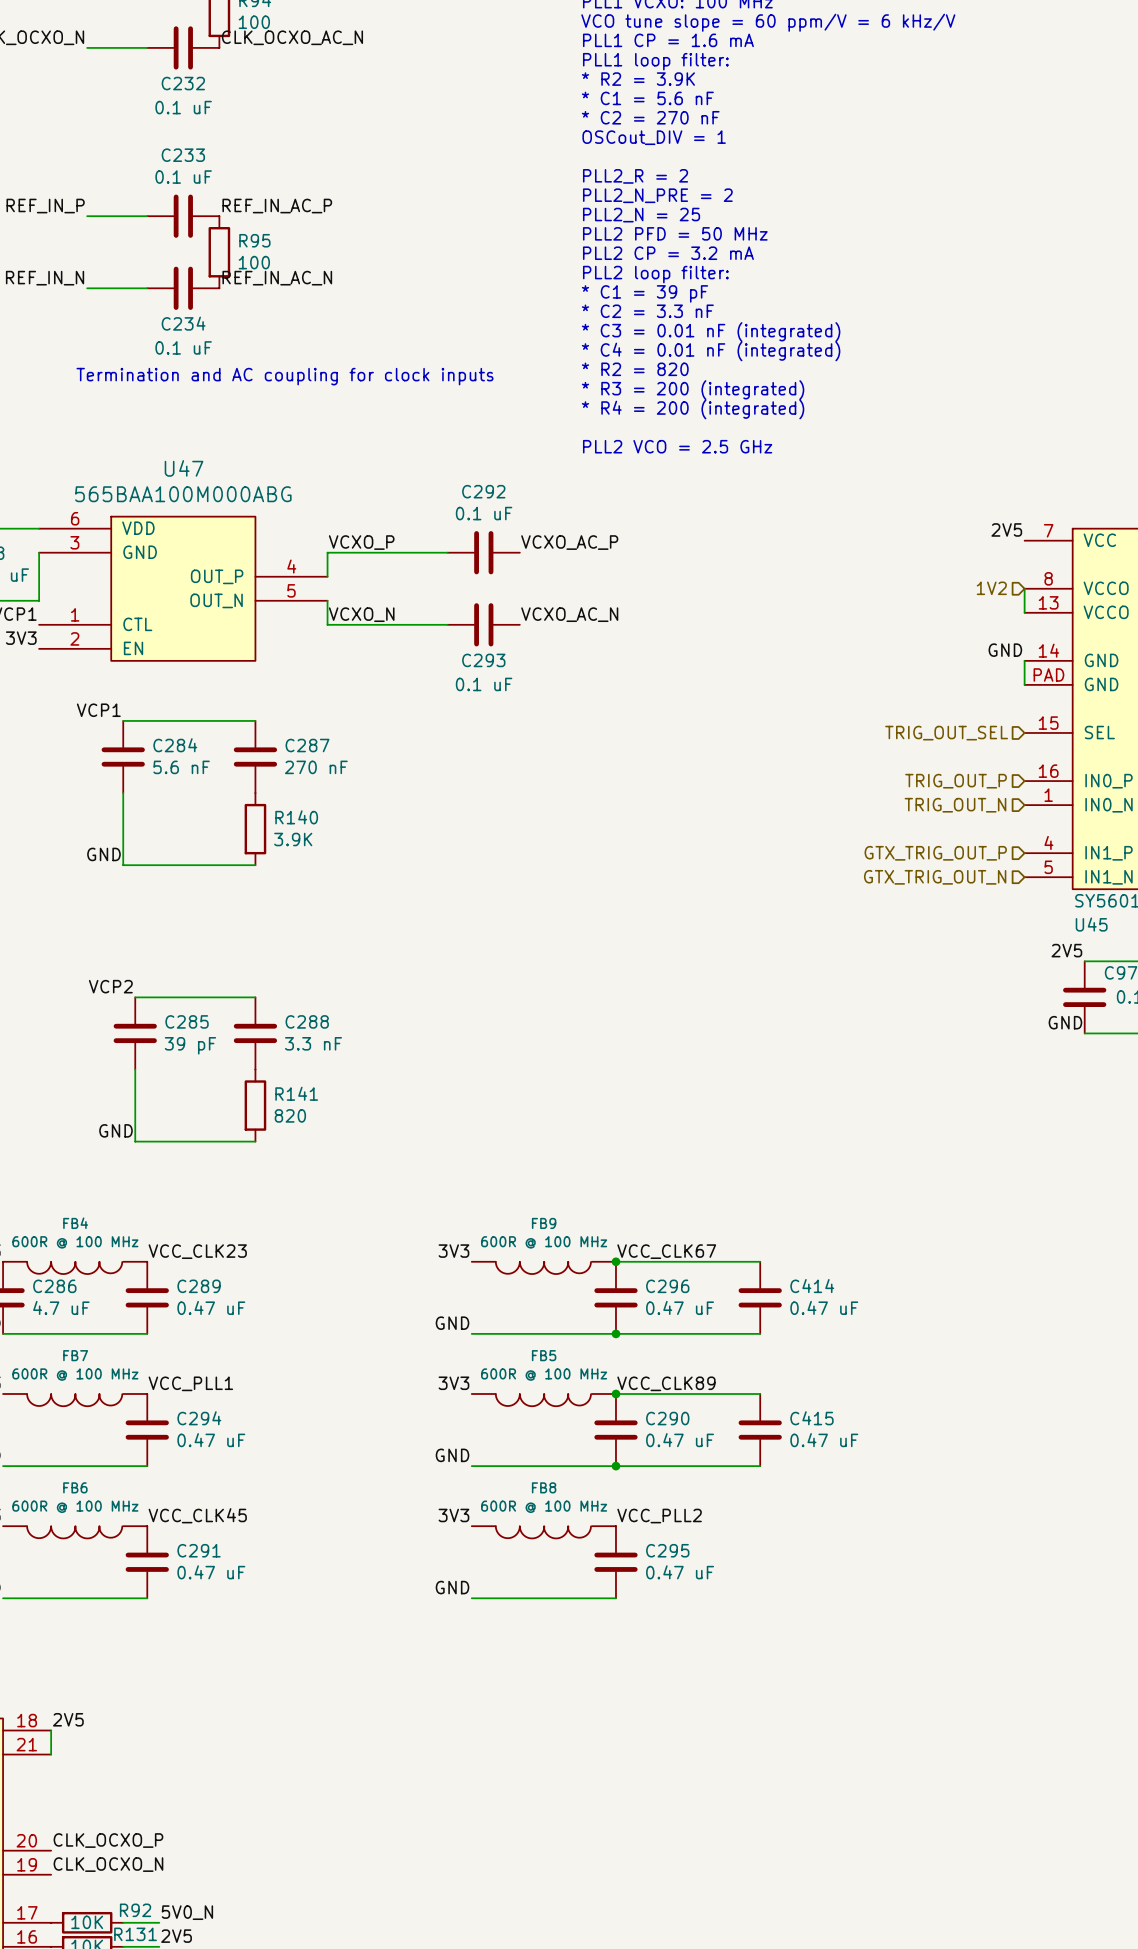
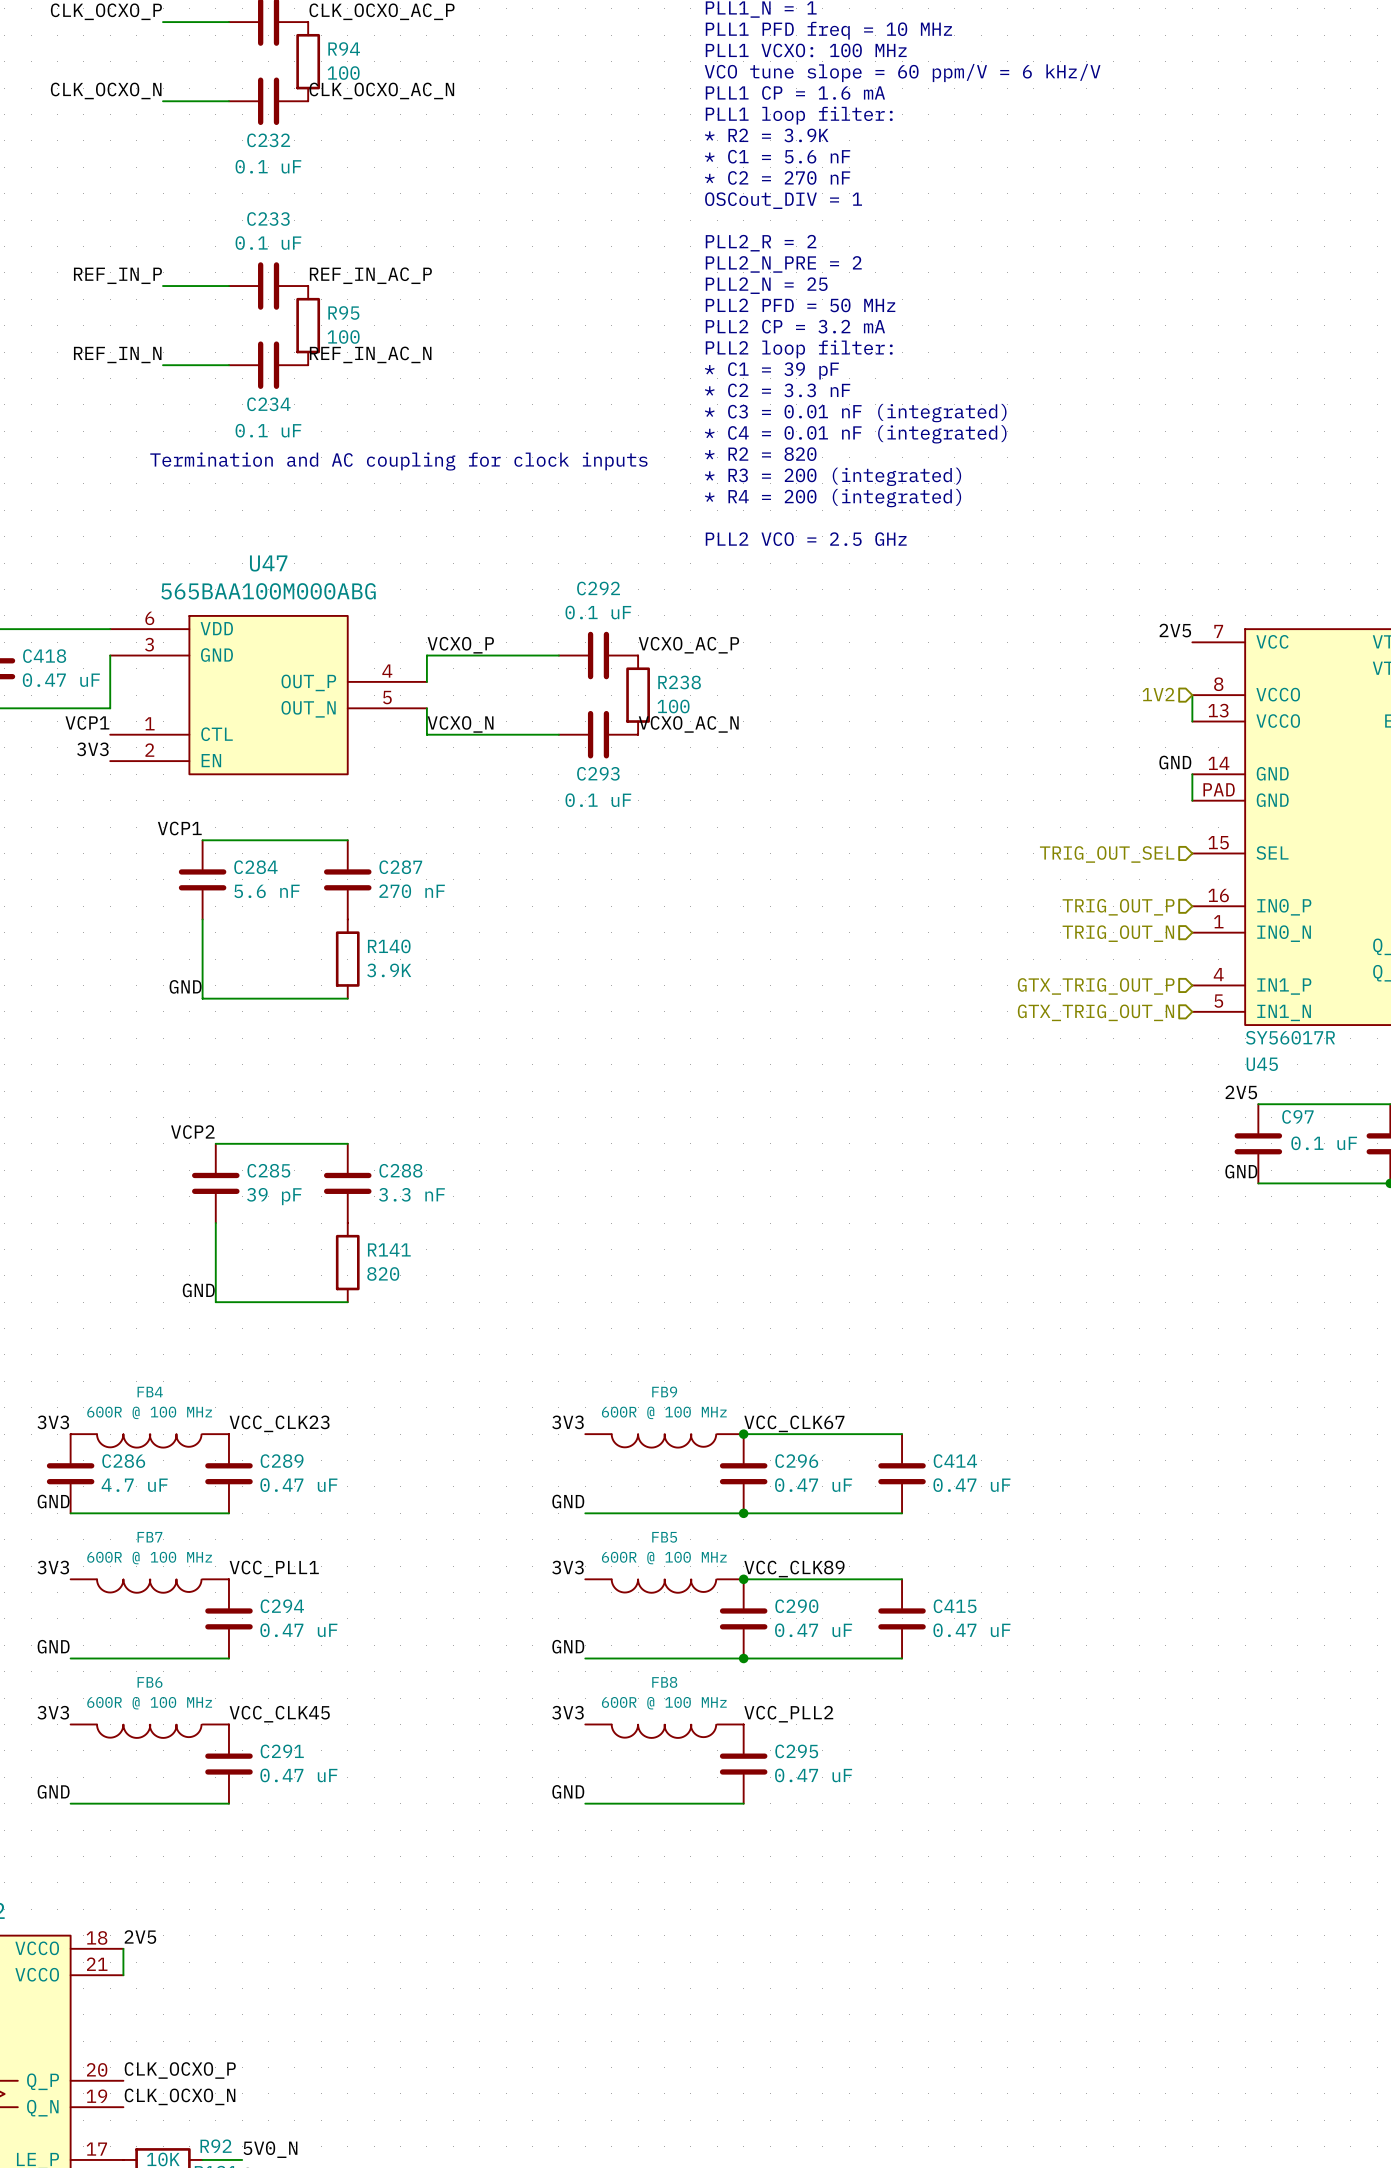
R238: none -> 100 (638, 695)

